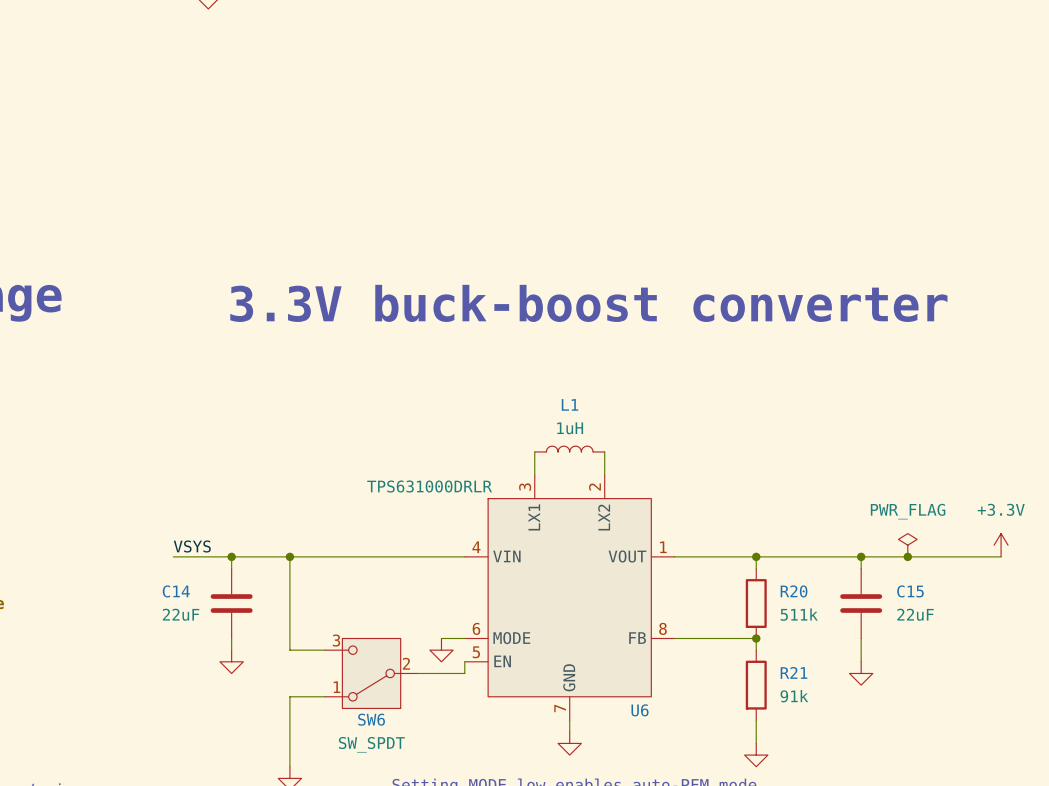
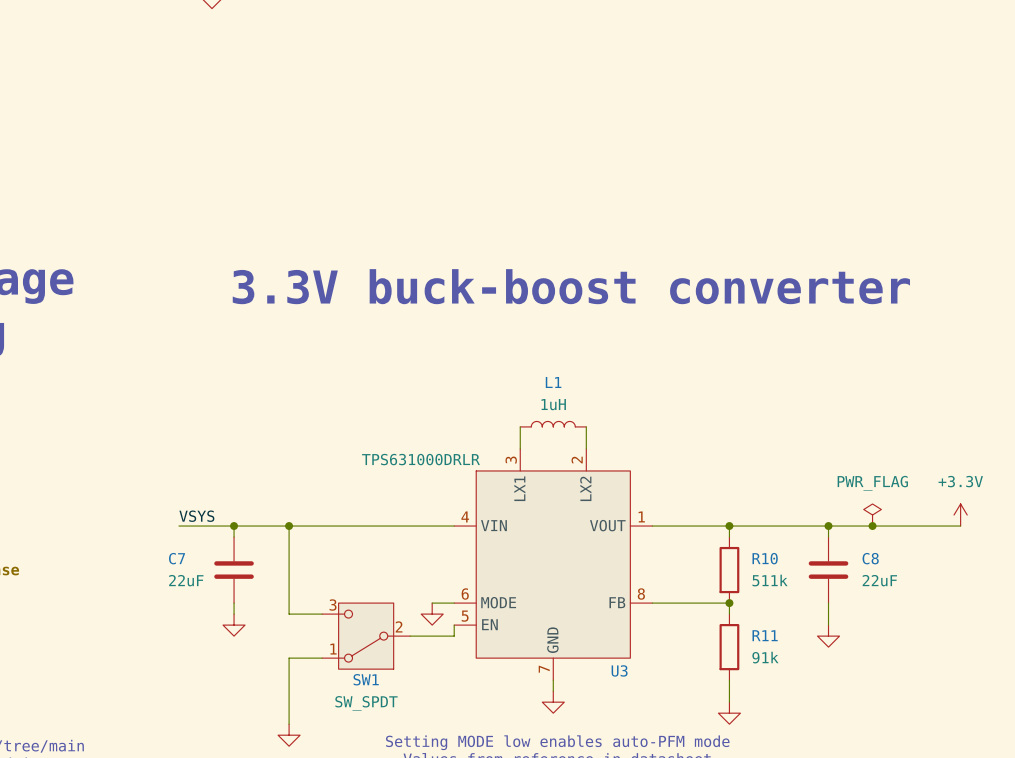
C14 name: C14 (176, 591) -> C7 (177, 558)
R20 name: R20 (794, 591) -> R10 (765, 558)
C15 name: C15 (910, 591) -> C8 (870, 558)
R21 name: R21 (794, 672) -> R11 (765, 635)
U6 name: U6 (640, 710) -> U3 (619, 670)
SW6 name: SW6 (371, 719) -> SW1 (366, 679)

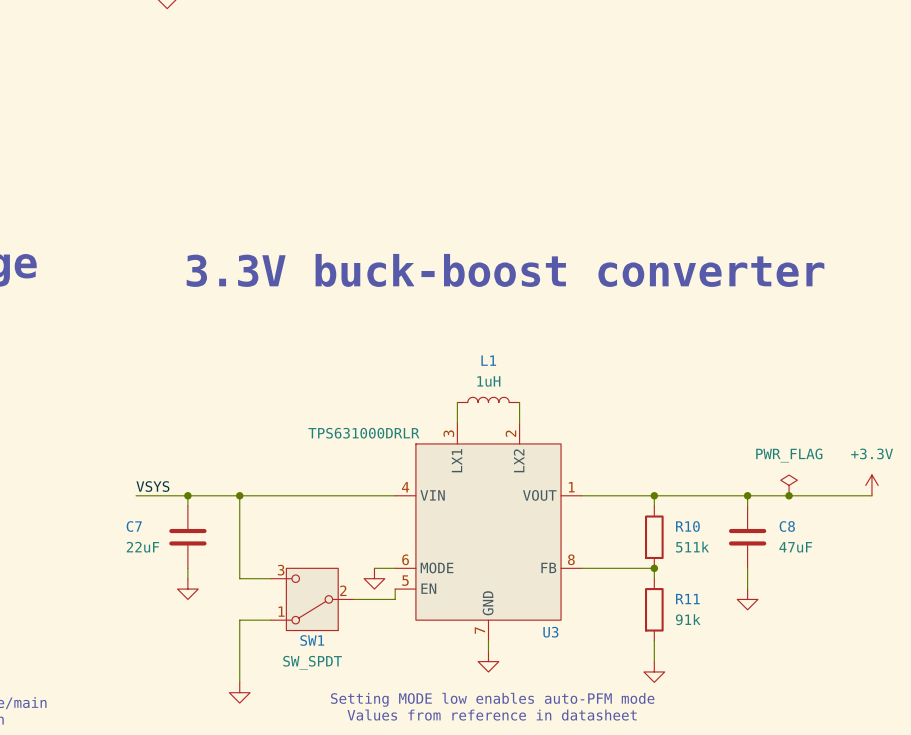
C8 value: 22uF (879, 580) -> 47uF (795, 547)

